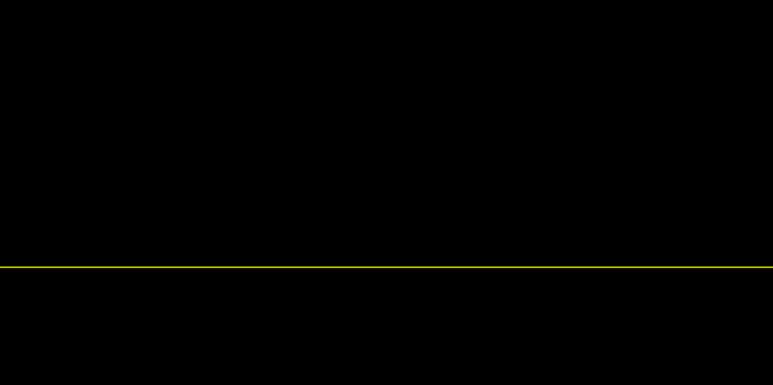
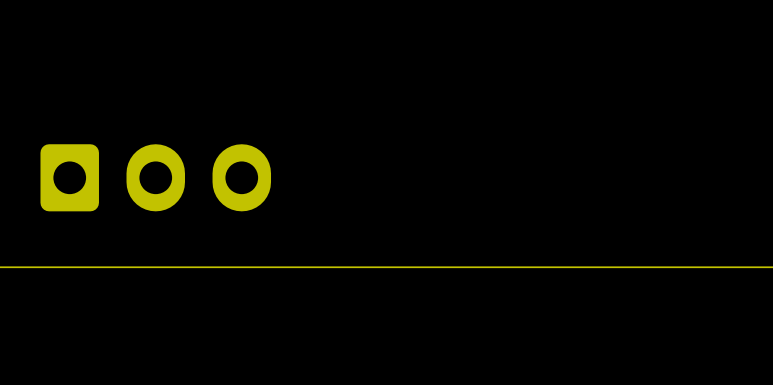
part: none -> (155, 177)

